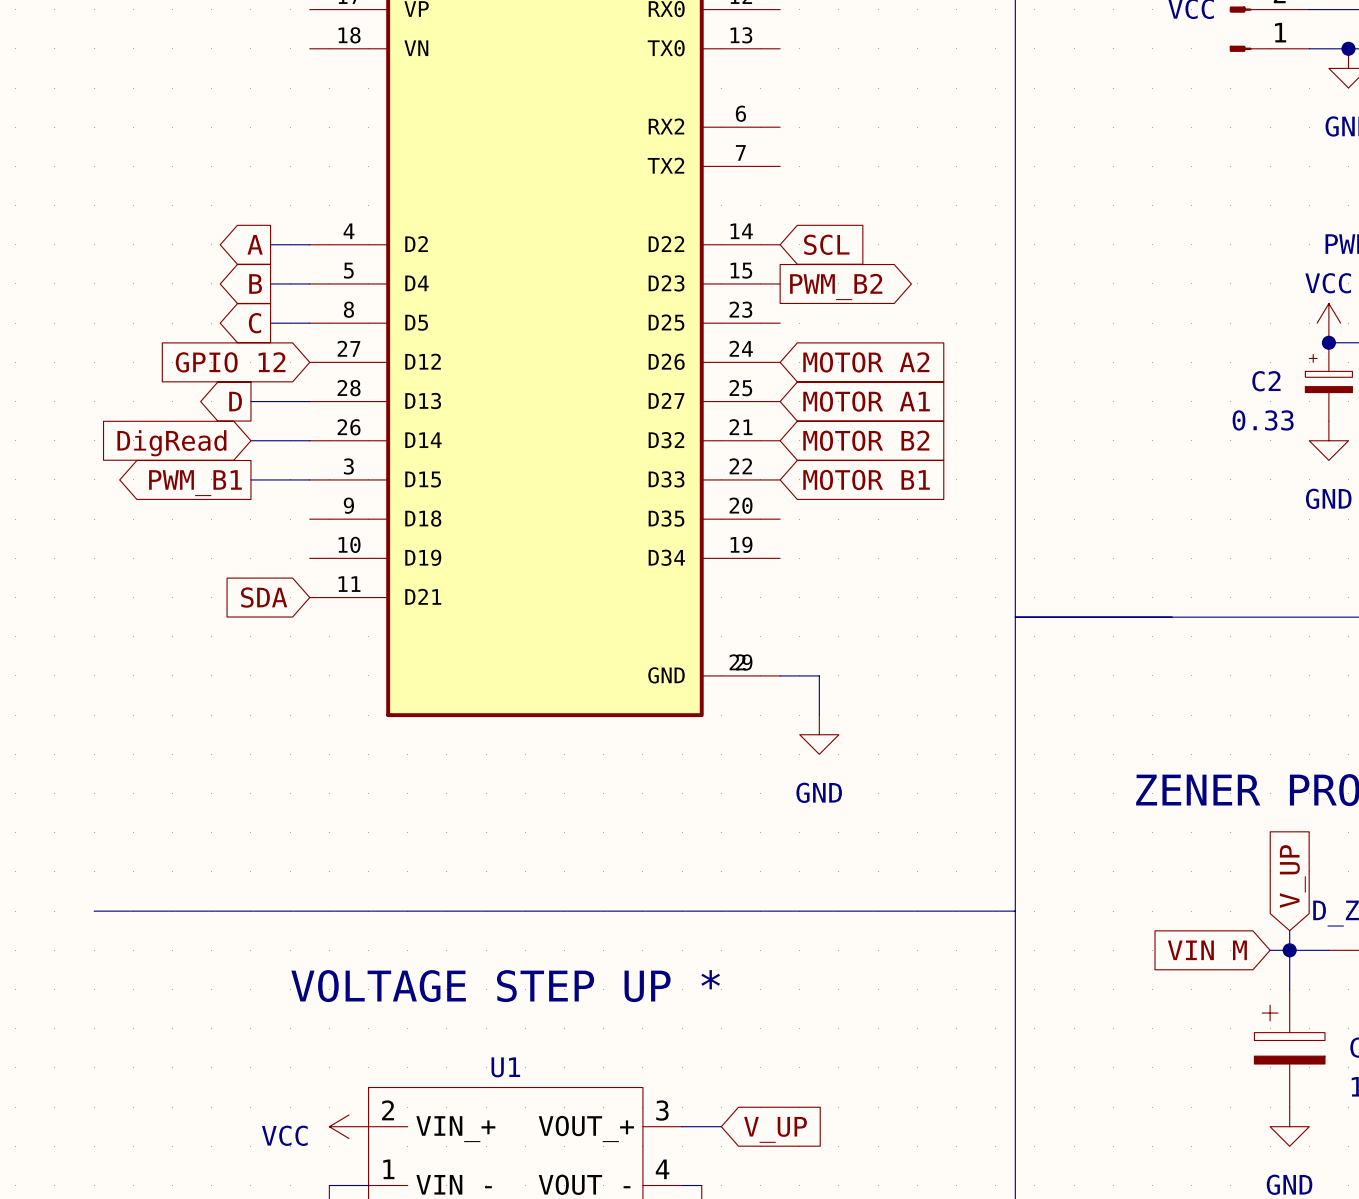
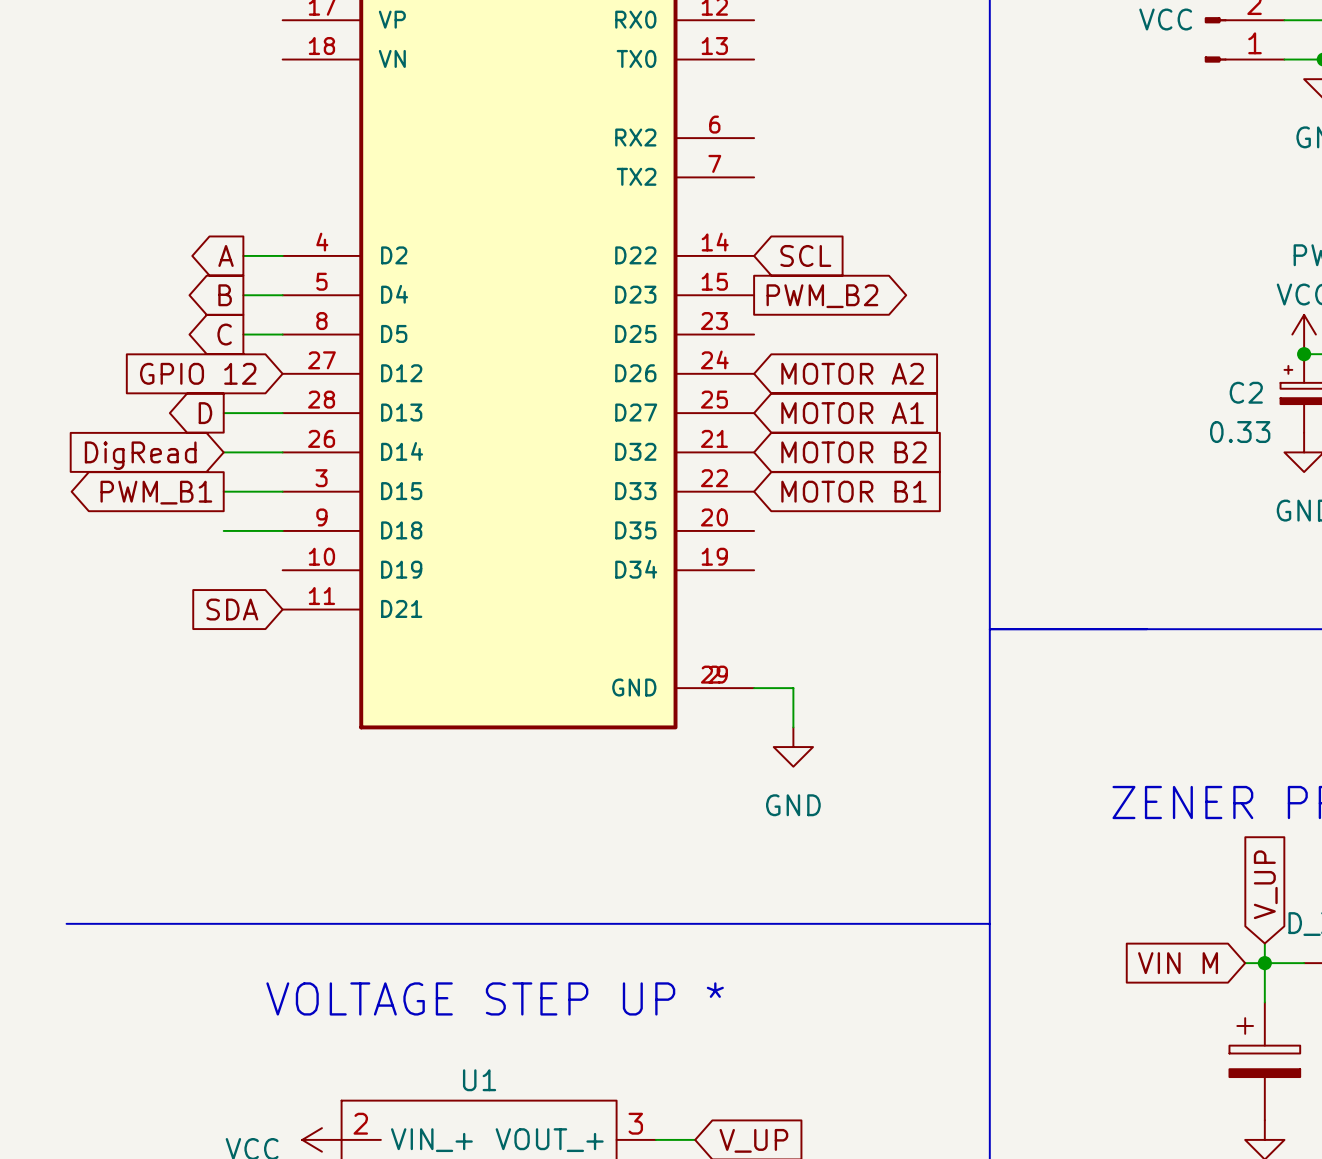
wire: none -> (223, 530) (282, 530)

